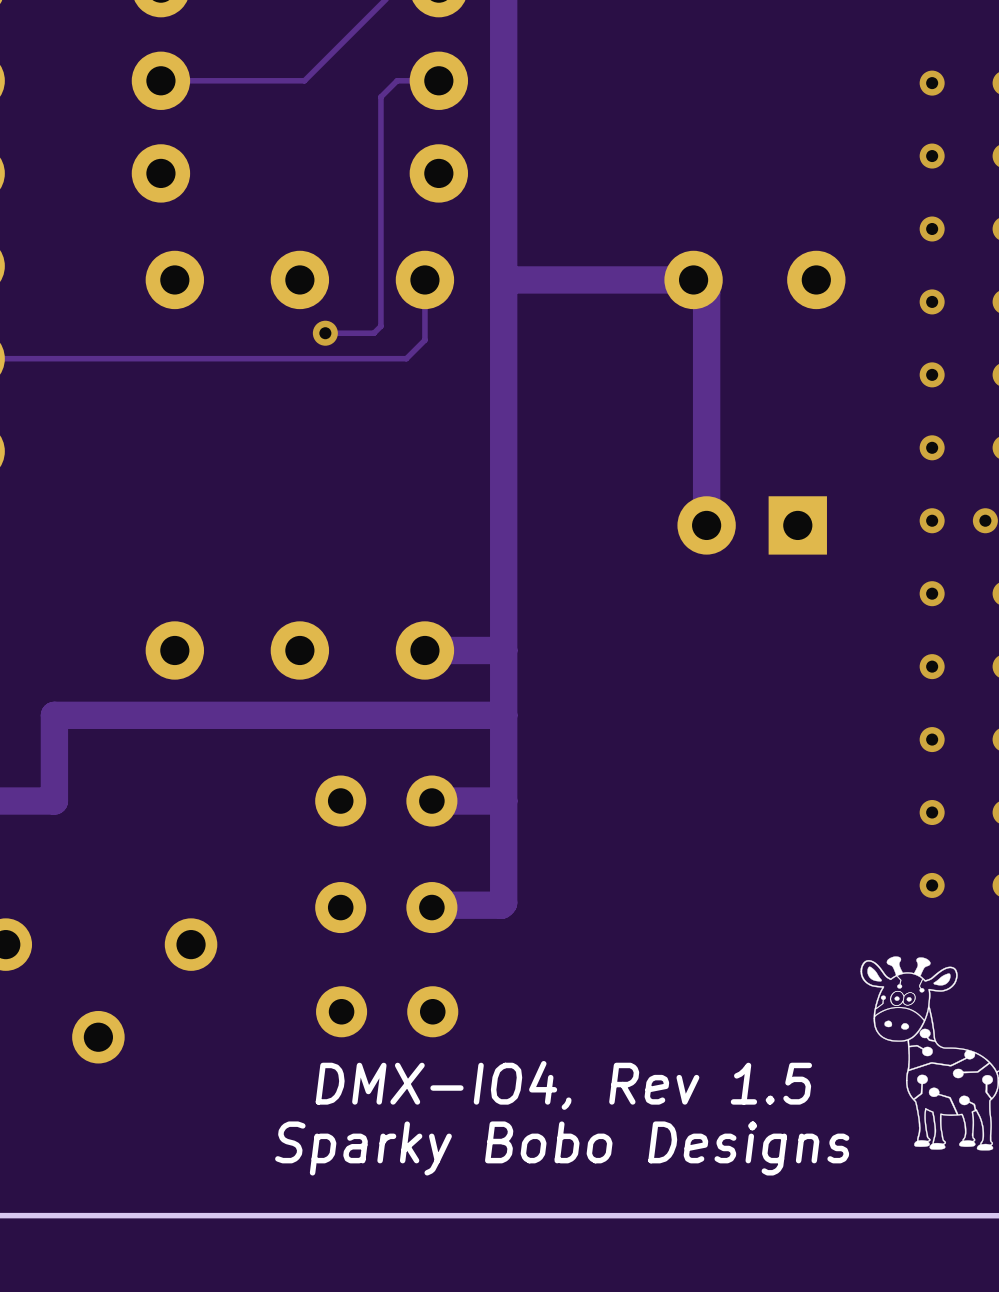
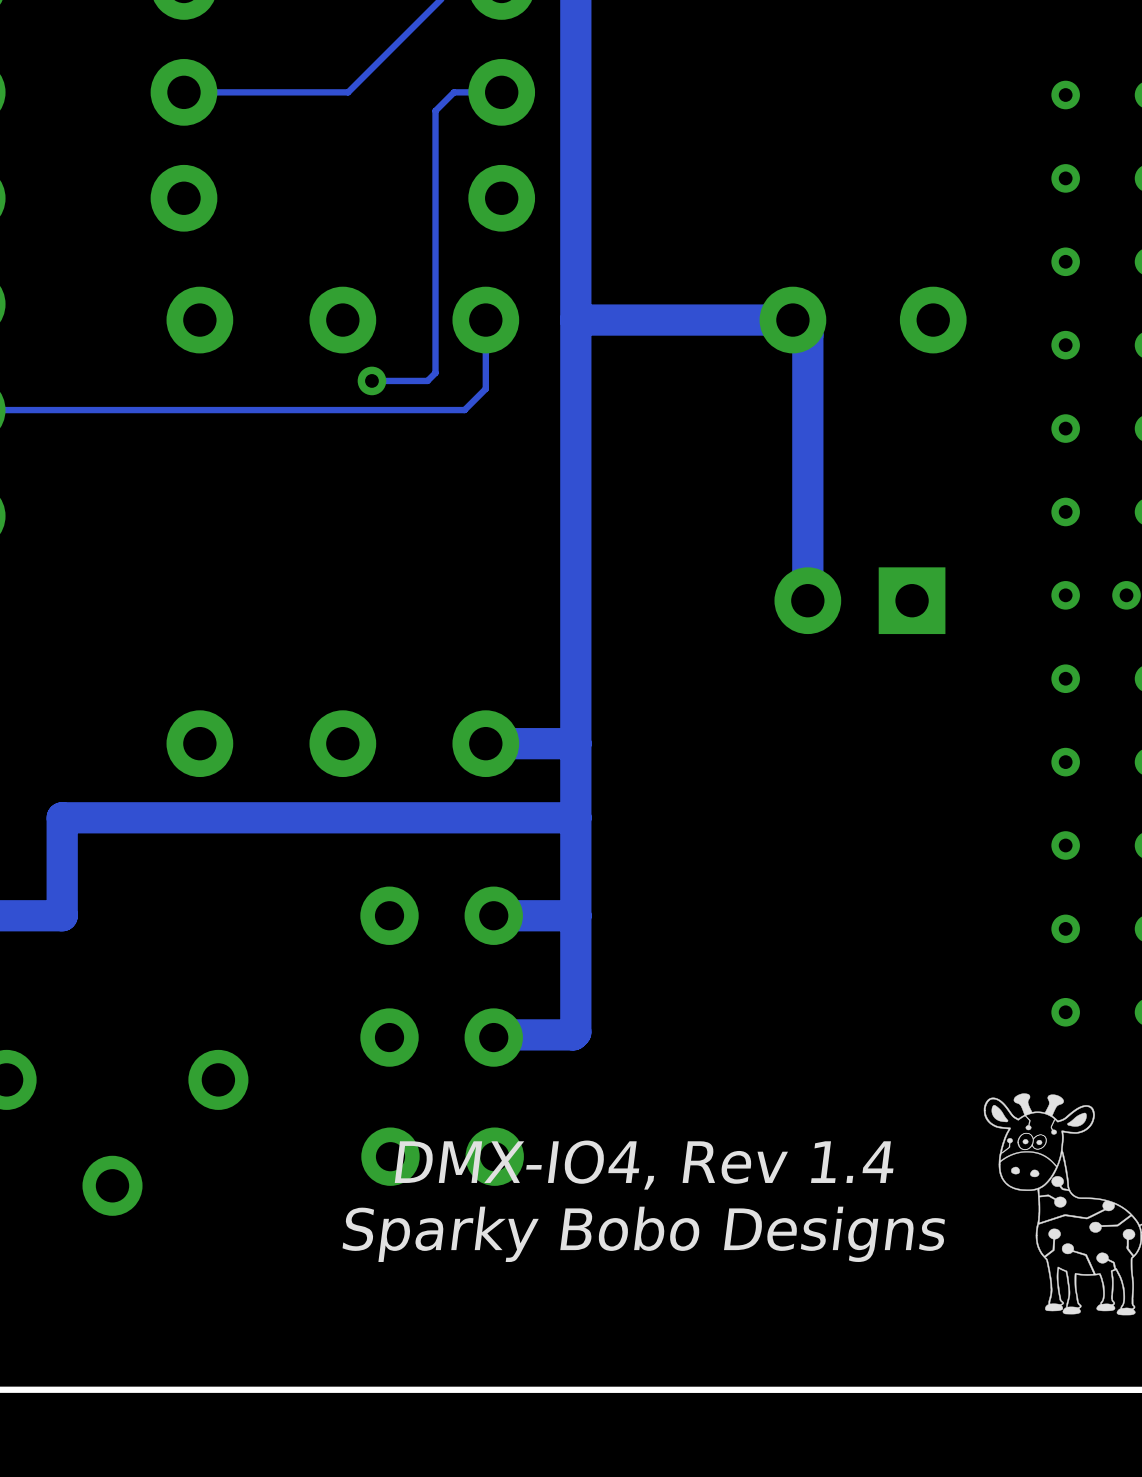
text: none -> DMX-IO4, Rev 1.4 (644, 1165)
text: DMX-IO4, Rev 1.5 (563, 1085) -> Sparky Bobo Designs (643, 1234)
text: Sparky Bobo Designs (562, 1148) -> none

